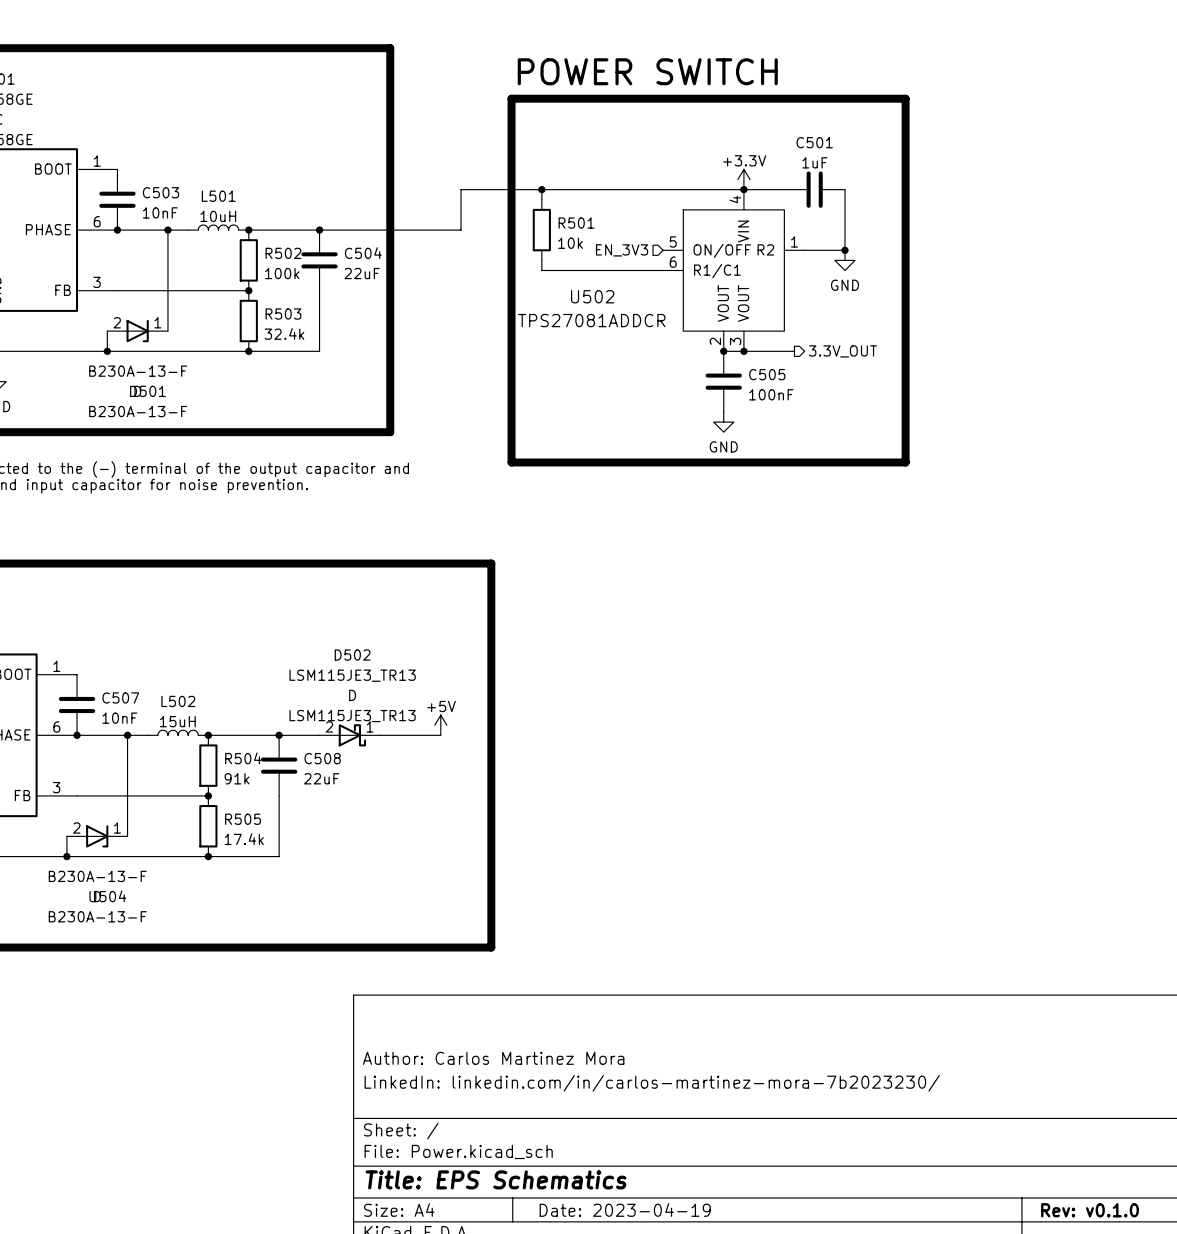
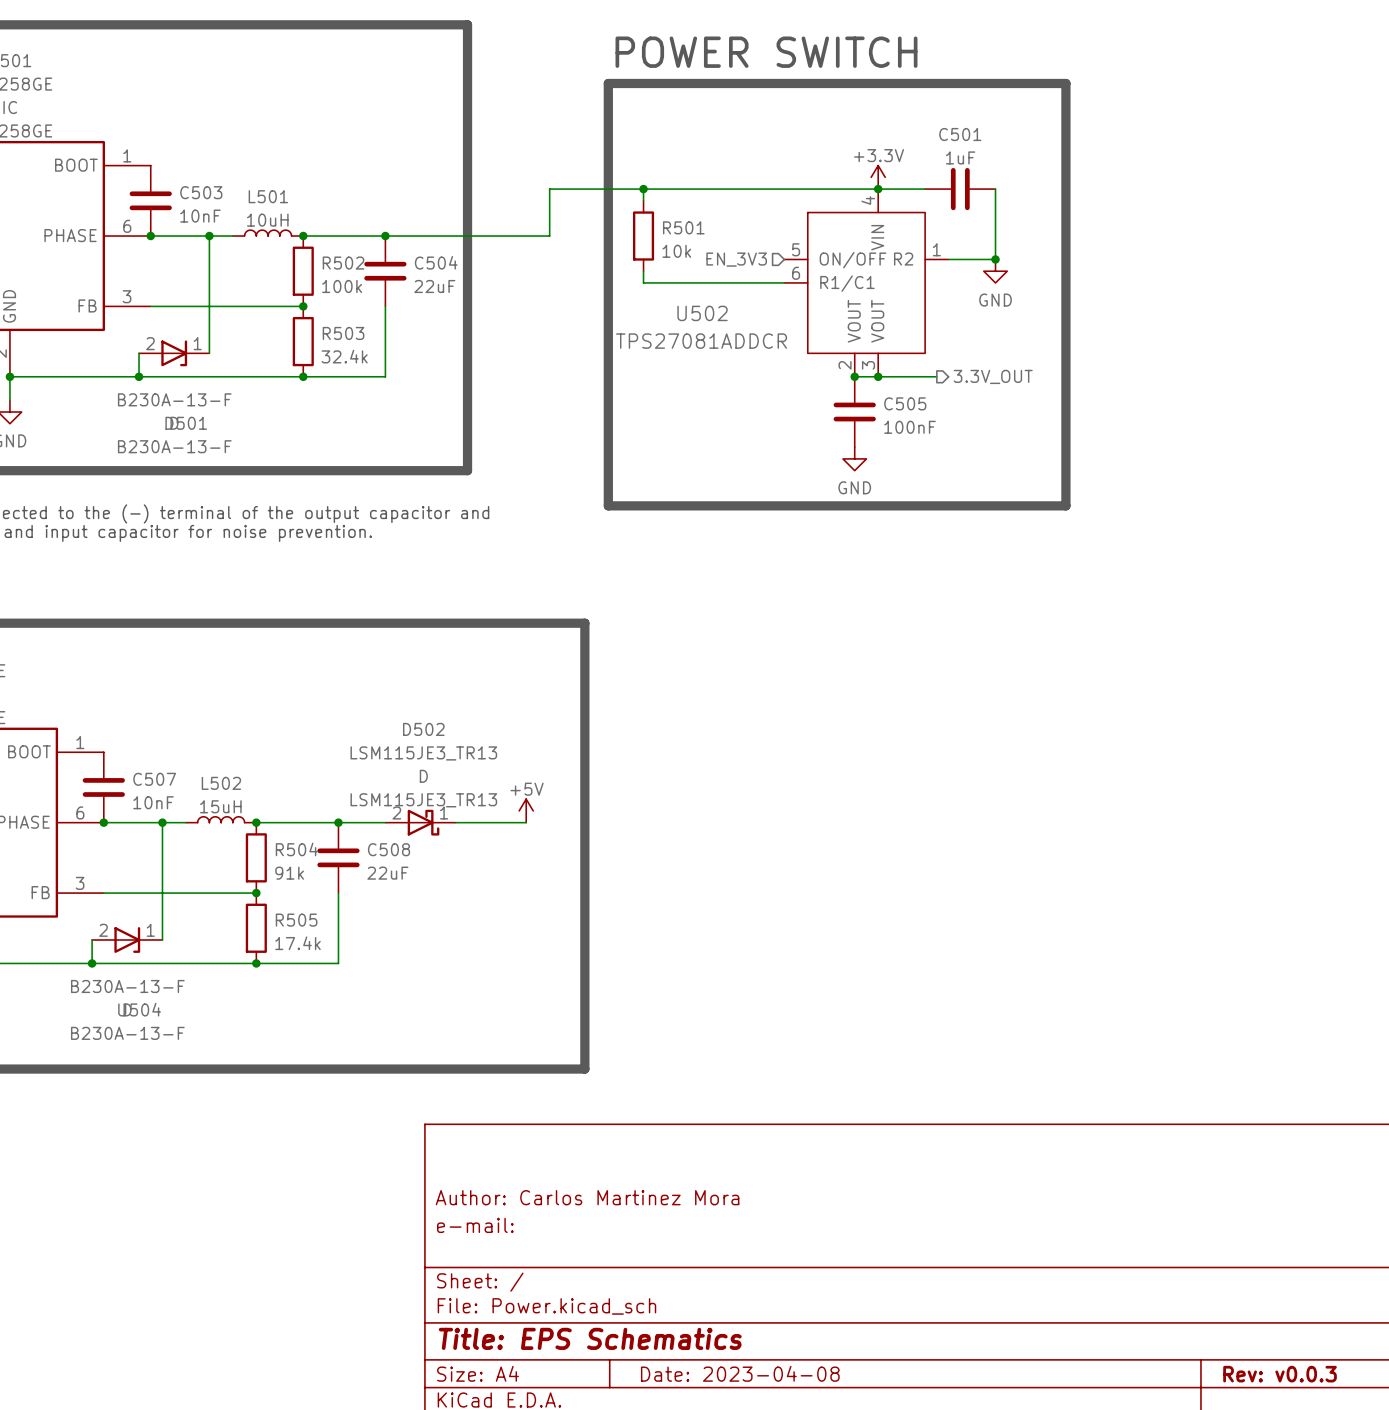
title block: LinkedIn: linkedin.com/in/carlos-martinez-mora-7b2023230/ (652, 1083) -> e-mail: (475, 1225)
title block: Date: 2023-04-19 (625, 1209) -> Date: 2023-04-08 (740, 1373)
title block: Rev: v0.1.0 (1090, 1210) -> Rev: v0.0.3 (1280, 1374)

